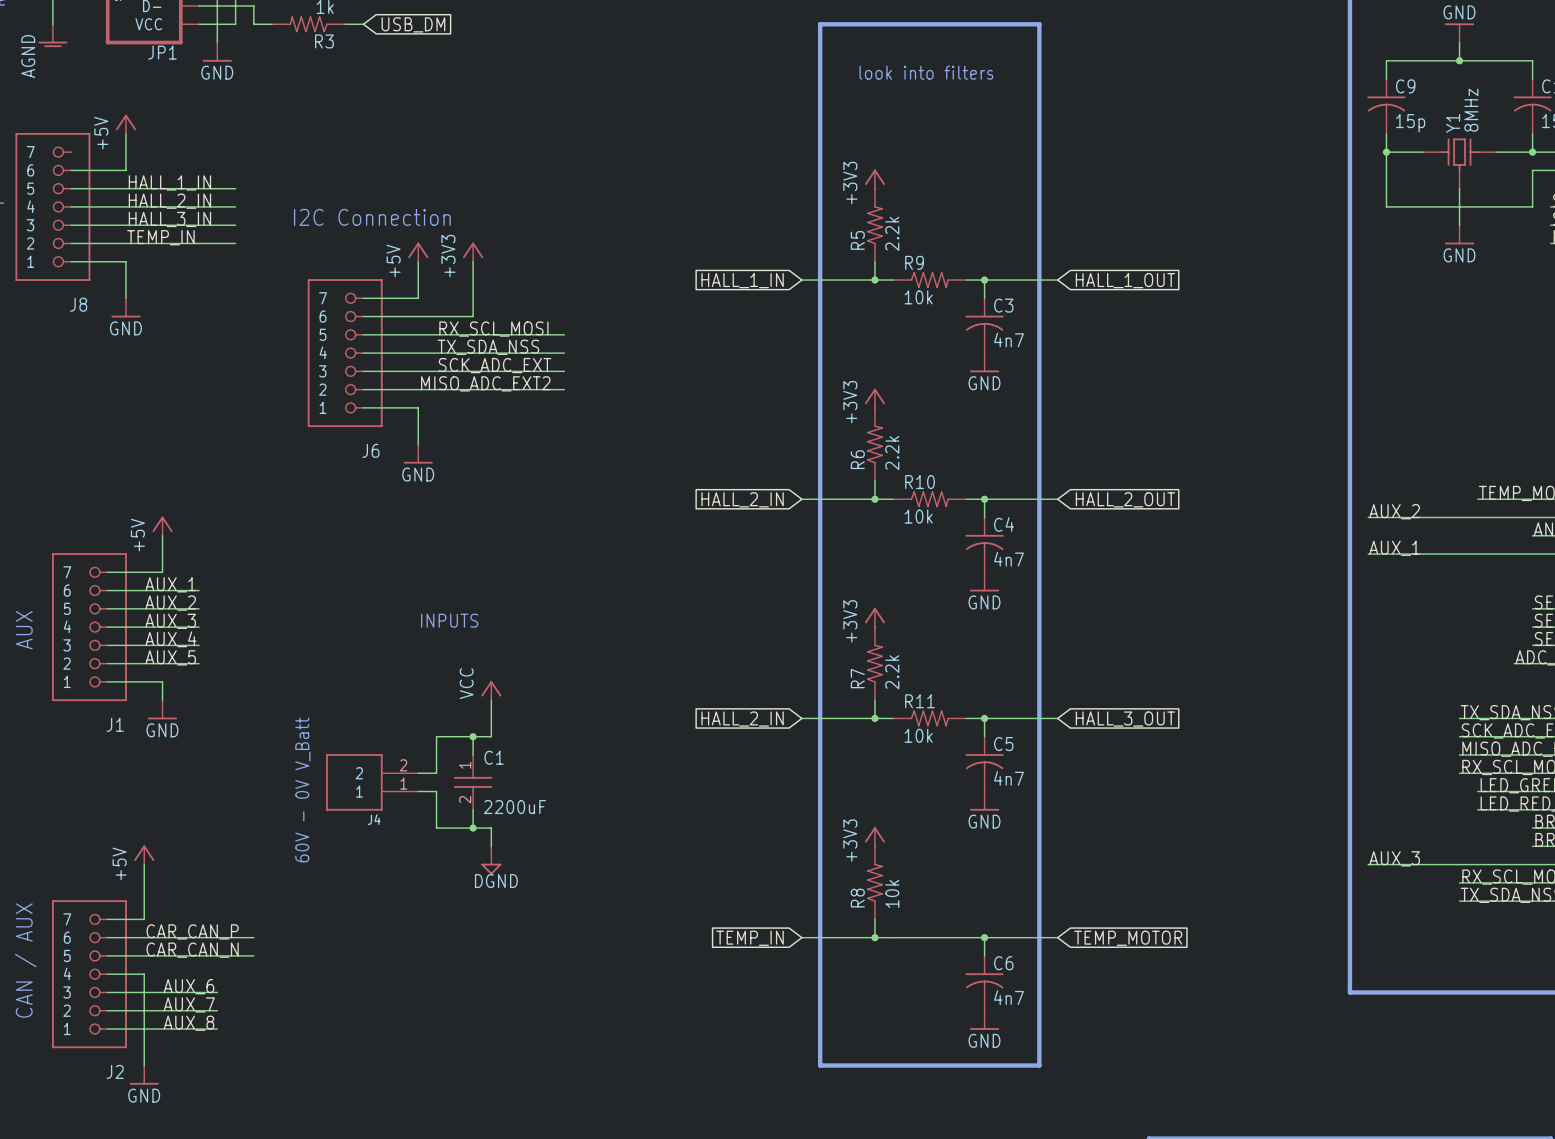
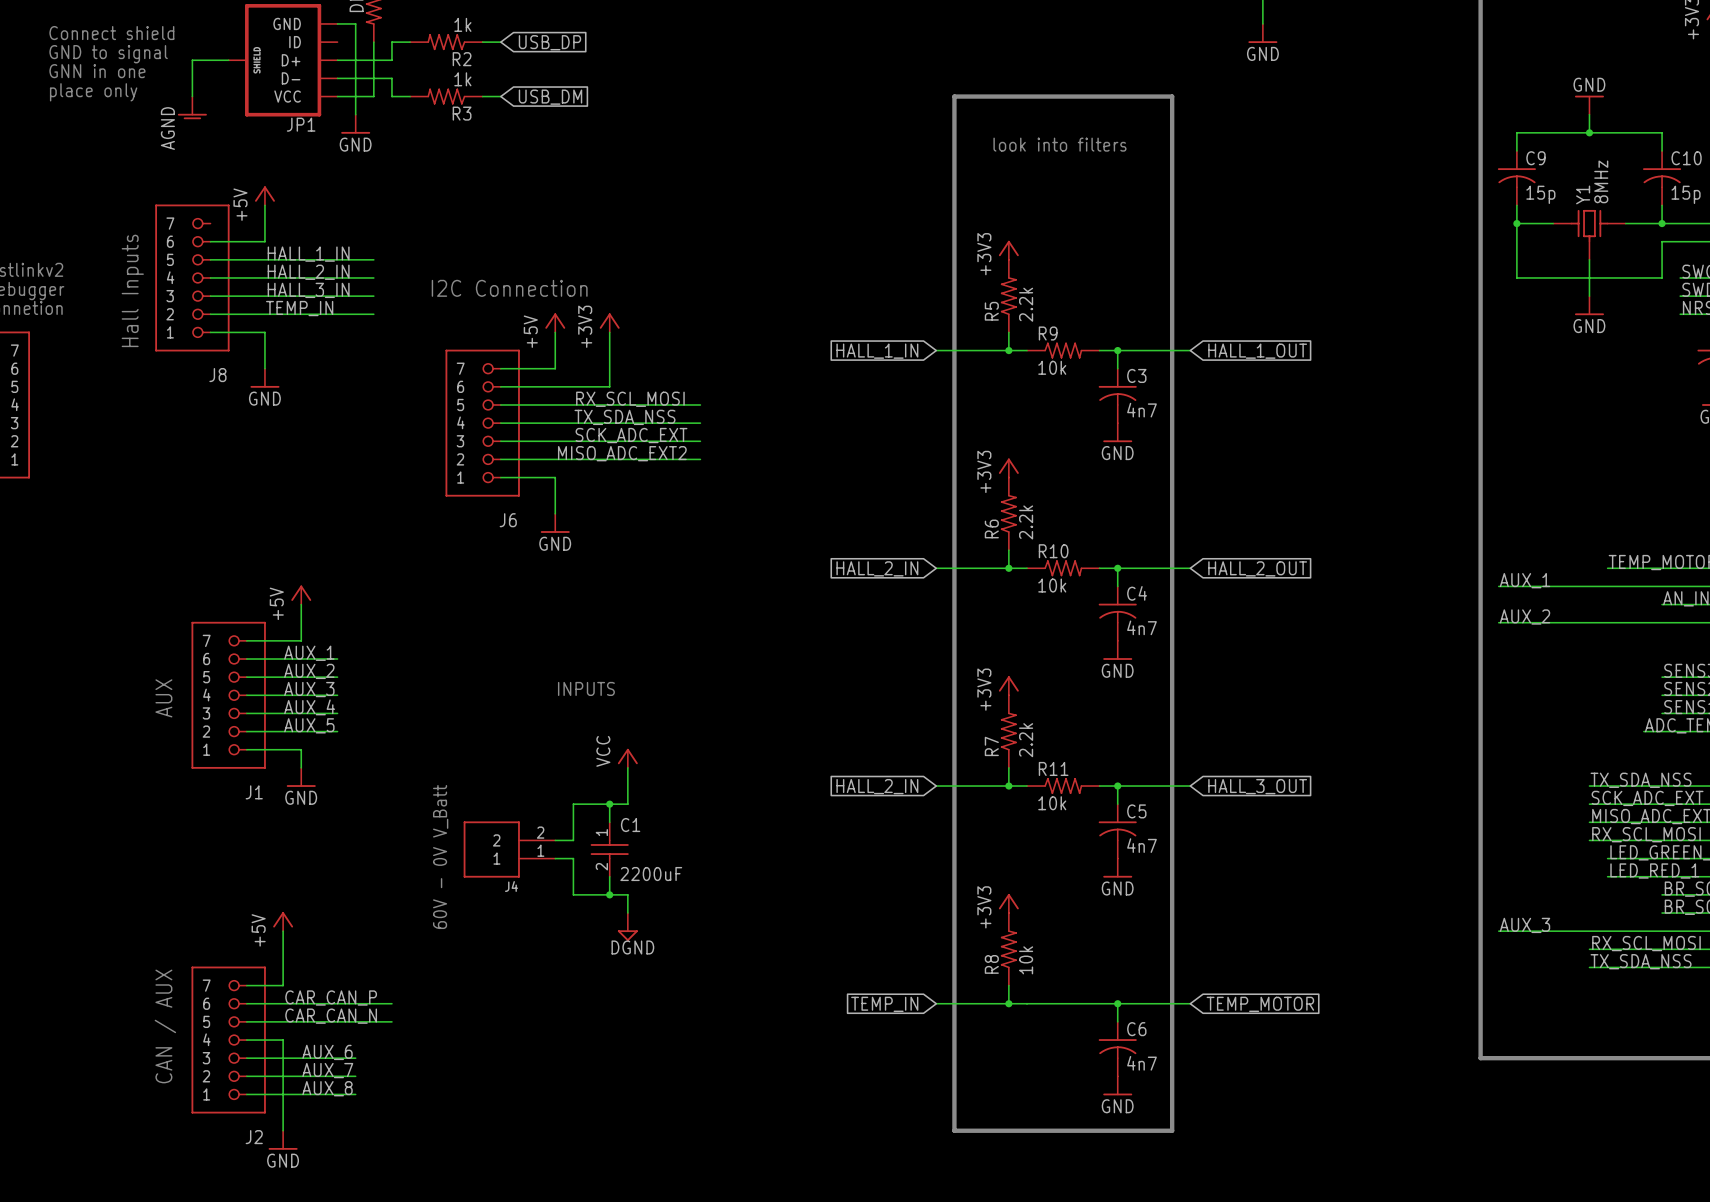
label: AUX_2 (1394, 511) -> AUX_1 (1525, 580)
label: AUX_1 (1394, 548) -> AUX_2 (1525, 616)

